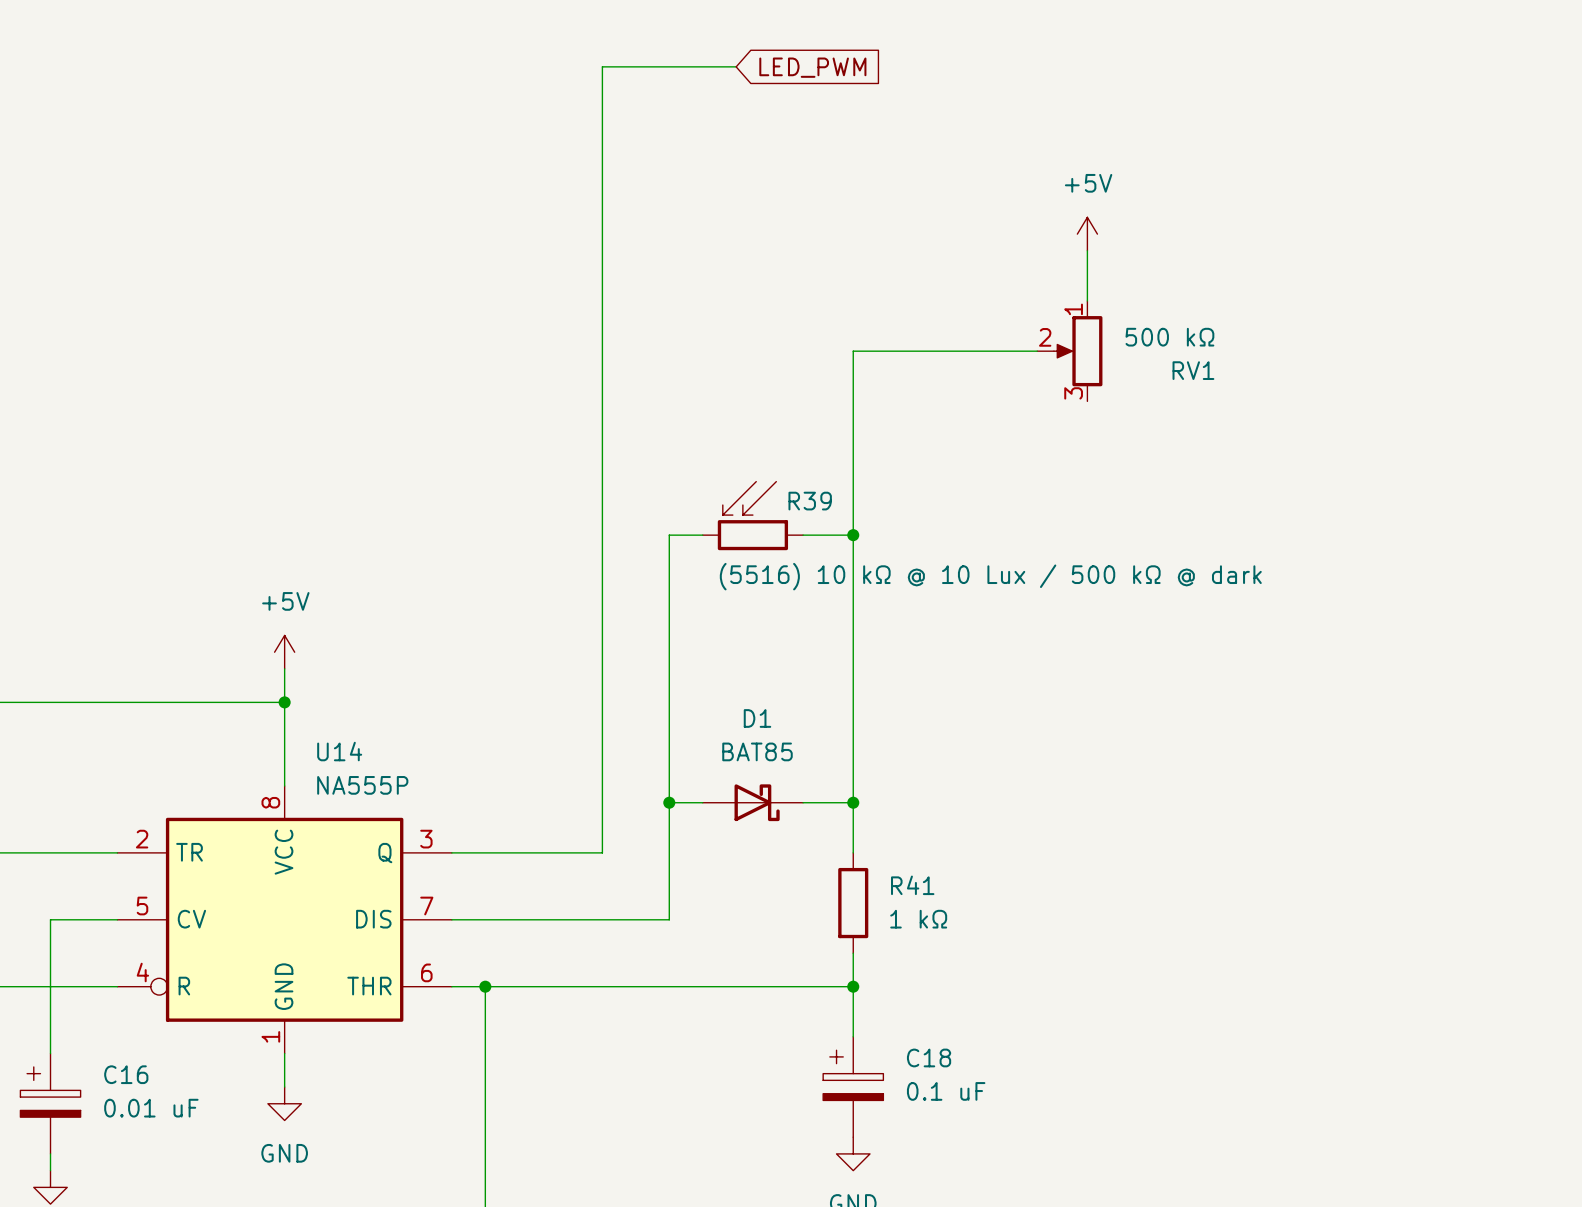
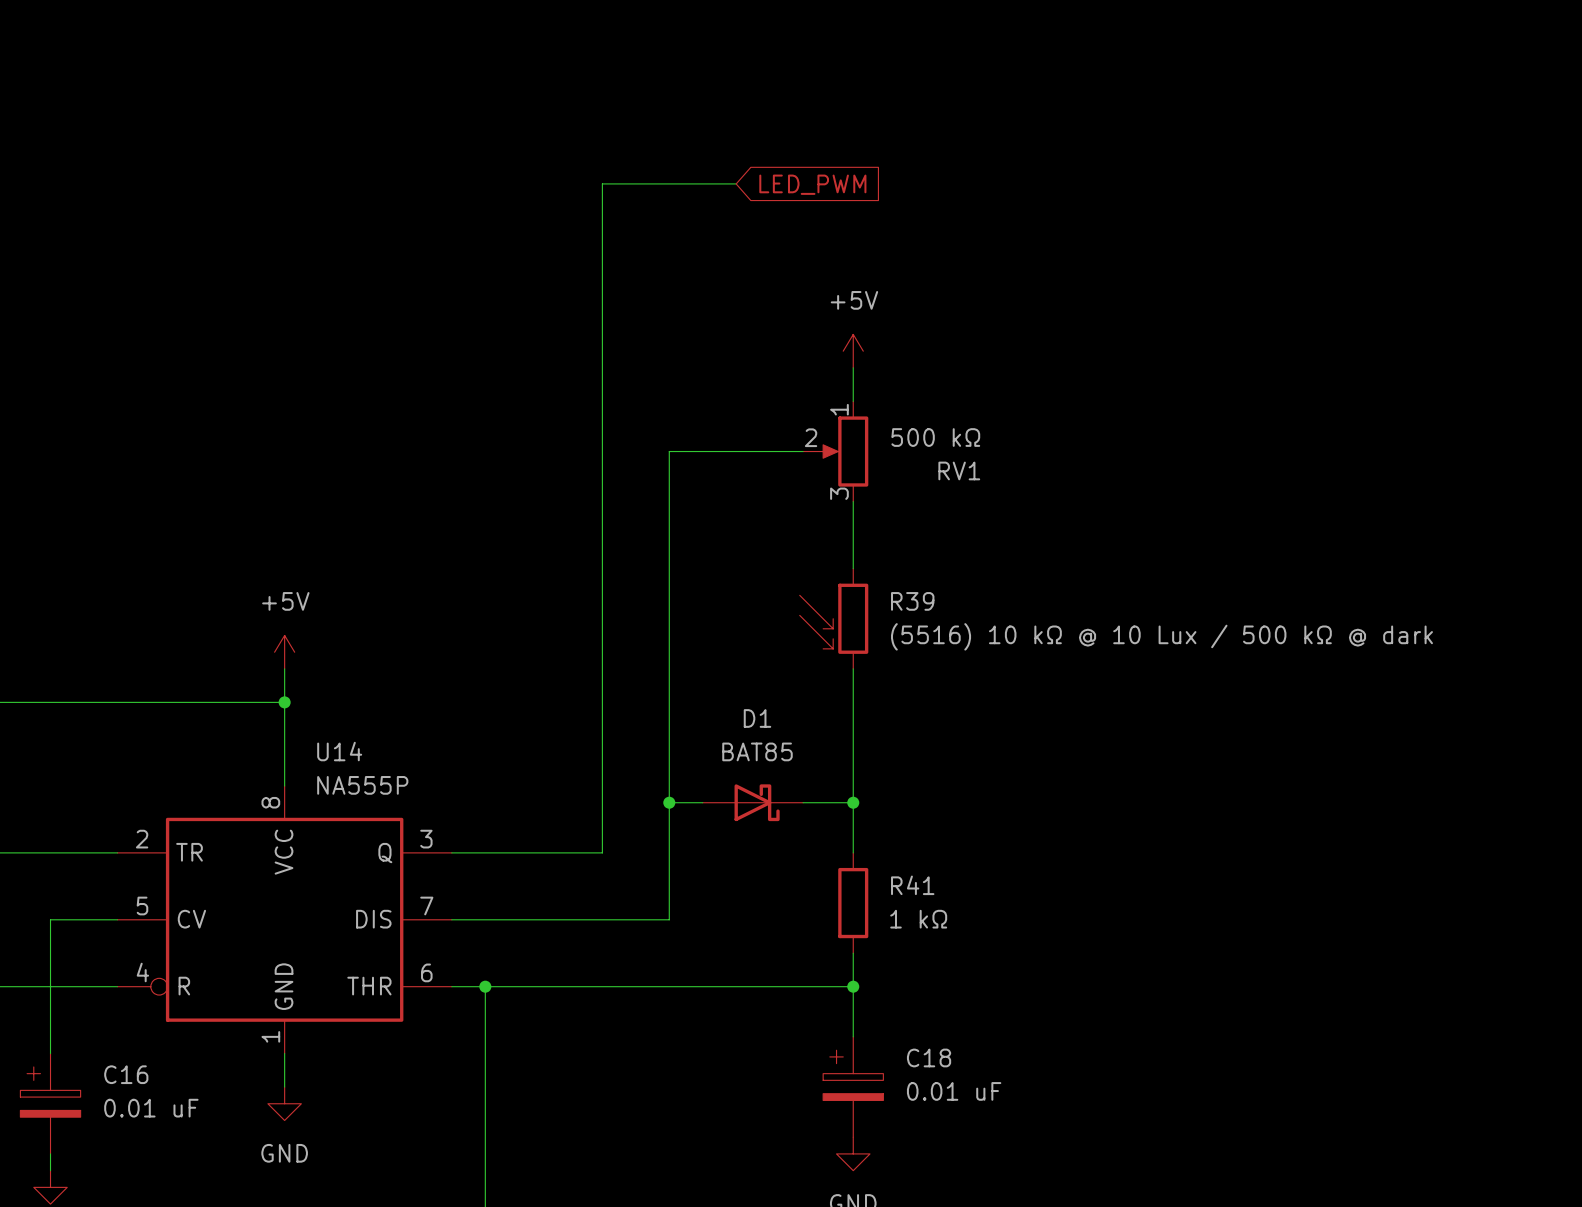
wire: (736, 66) (602, 66) (602, 183) -> (736, 183) (602, 183)
global label position: LED_PWM (812, 67) -> LED_PWM (812, 184)
power symbol position: +5V (1087, 234) -> +5V (853, 351)
wire: (1087, 250) (1087, 301) -> none
wire: (1037, 351) (853, 351) (853, 367) -> none
RV1 position: (1069, 351) -> (835, 451)
wire: (853, 401) (853, 501) -> none
R39 rotation: 0° (752, 515) -> 90° counterclockwise (834, 618)
R39 position: (752, 515) -> (834, 618)
wire: (669, 535) (702, 535) -> (669, 535) (669, 451) (803, 451)
wire: (803, 535) (853, 535) -> none
junction: (853, 535) -> none
wire: (853, 568) (853, 668) -> none
R39 value position: (5516) 10 kΩ @ 10 Lux / 500 kΩ @ dark (990, 576) -> (5516) 10 kΩ @ 10 Lux / 500 kΩ @ dark (1161, 636)
C18 value: 0.1 uF (946, 1091) -> 0.01 uF (954, 1091)

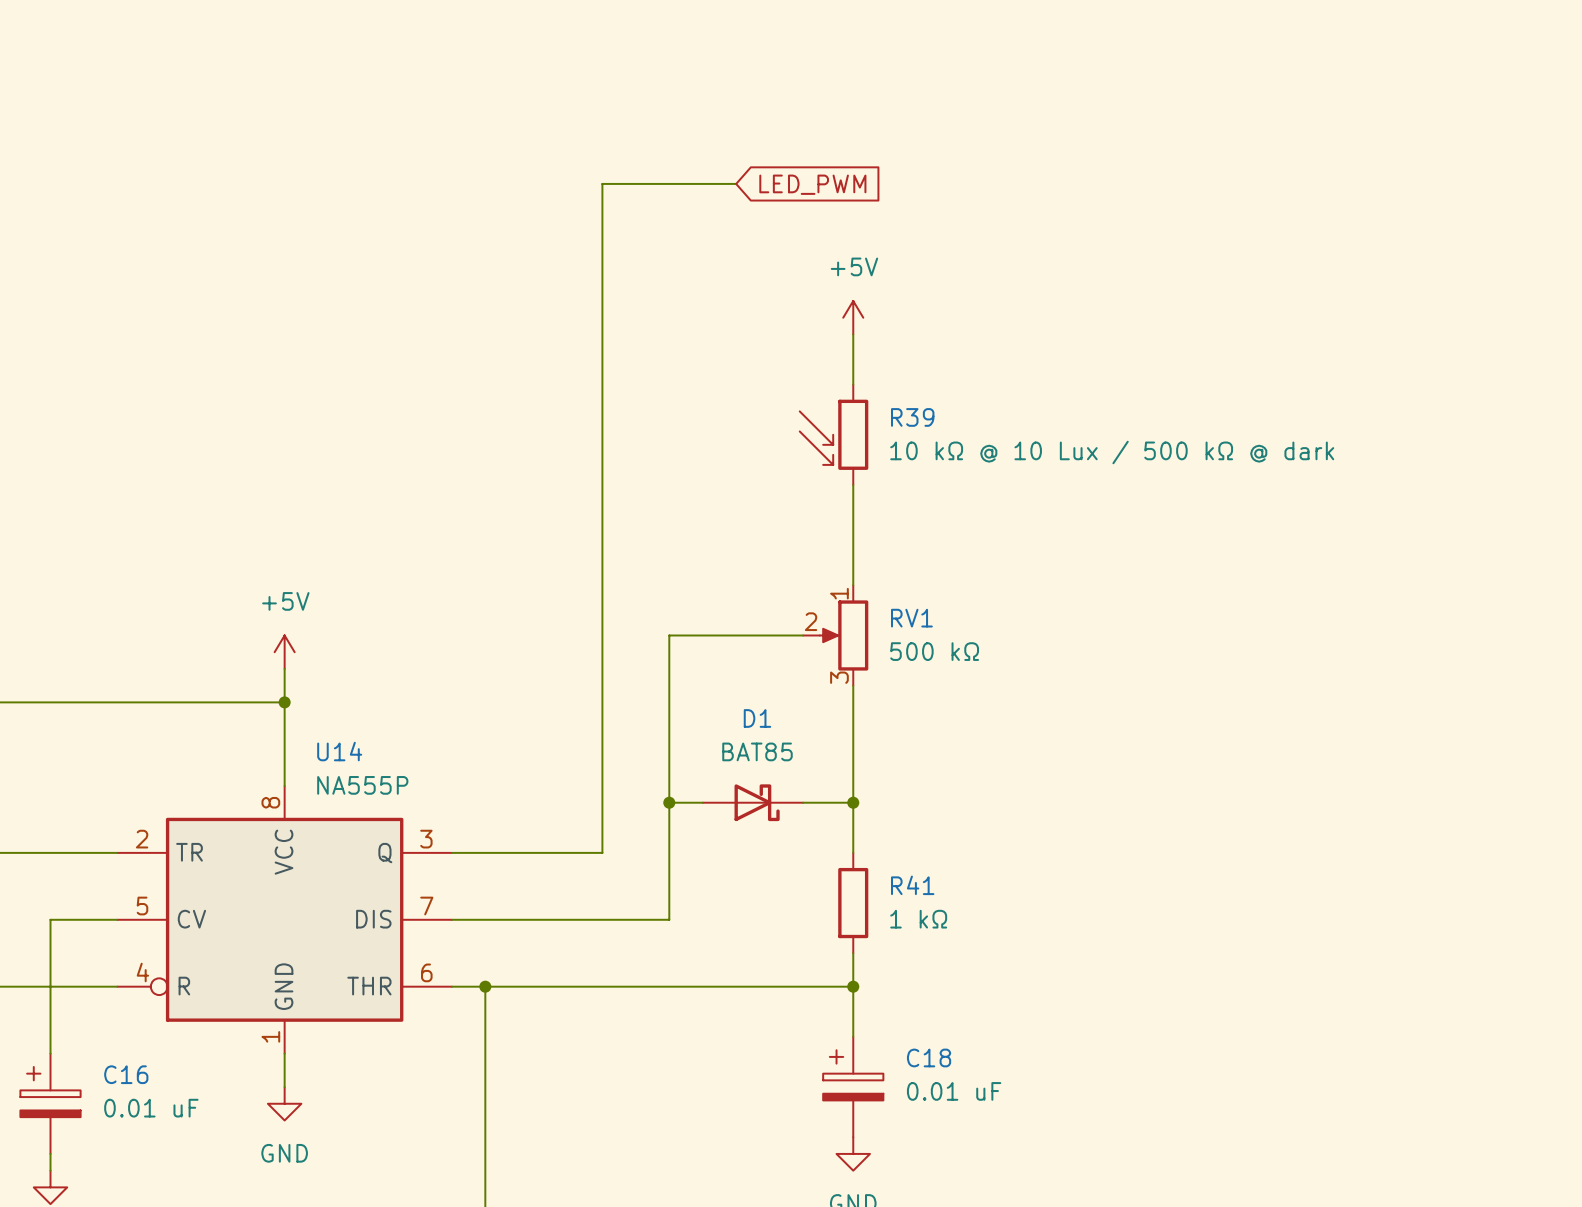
power symbol position: +5V (853, 351) -> +5V (853, 317)
RV1 value position: 500 kΩ (935, 437) -> 500 kΩ (934, 651)
wire: (803, 451) (669, 451) (669, 635) -> (803, 635) (669, 635)
RV1 position: (835, 451) -> (835, 635)
RV1 name position: RV1 (959, 470) -> RV1 (911, 618)
R39 position: (834, 618) -> (834, 434)
R39 value: (5516) 10 kΩ @ 10 Lux / 500 kΩ @ dark (1161, 636) -> 10 kΩ @ 10 Lux / 500 kΩ @ dark (1112, 452)

